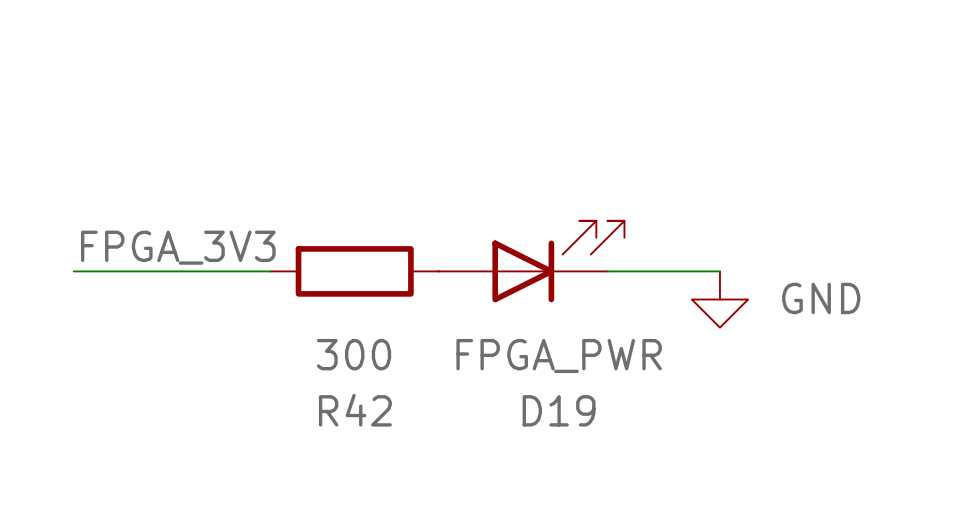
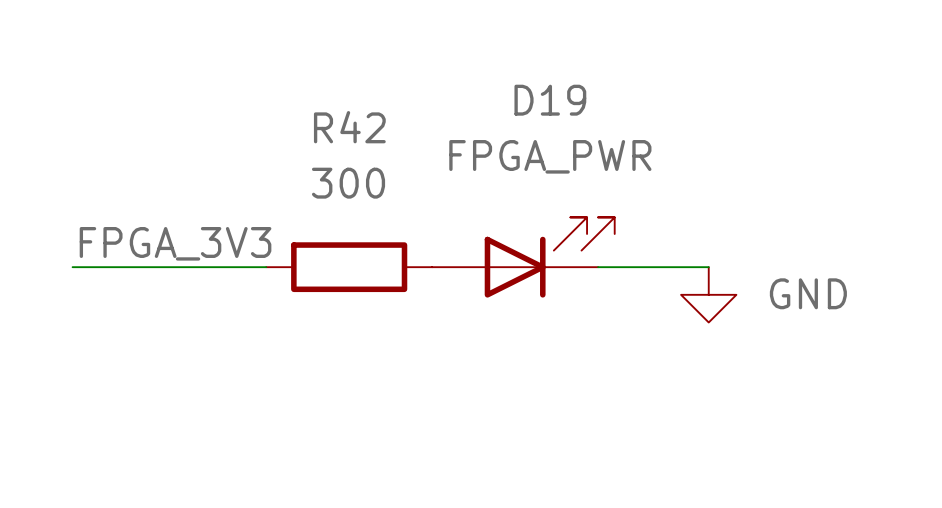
R42 value position: 300 (354, 354) -> 300 (348, 183)
D19 value position: FPGA_PWR (559, 355) -> FPGA_PWR (550, 156)
R42 name position: R42 (355, 410) -> R42 (349, 127)
D19 name position: D19 (559, 410) -> D19 (550, 100)

